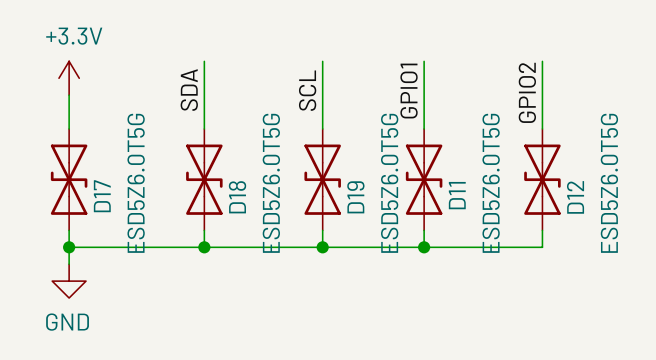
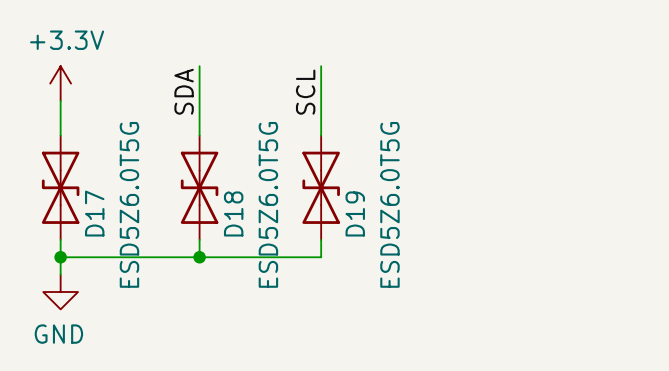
wire: (424, 61) (424, 128) -> none
wire: (542, 61) (542, 128) -> none
label: GPIO1 (409, 91) -> none
label: GPIO2 (527, 92) -> none
D11: ESD5Z6.0T5G (424, 179) -> none
D12: ESD5Z6.0T5G (542, 179) -> none
wire: (424, 230) (424, 247) -> none
wire: (542, 230) (542, 247) (322, 247) -> none
junction: (322, 247) -> none
junction: (424, 247) -> none

